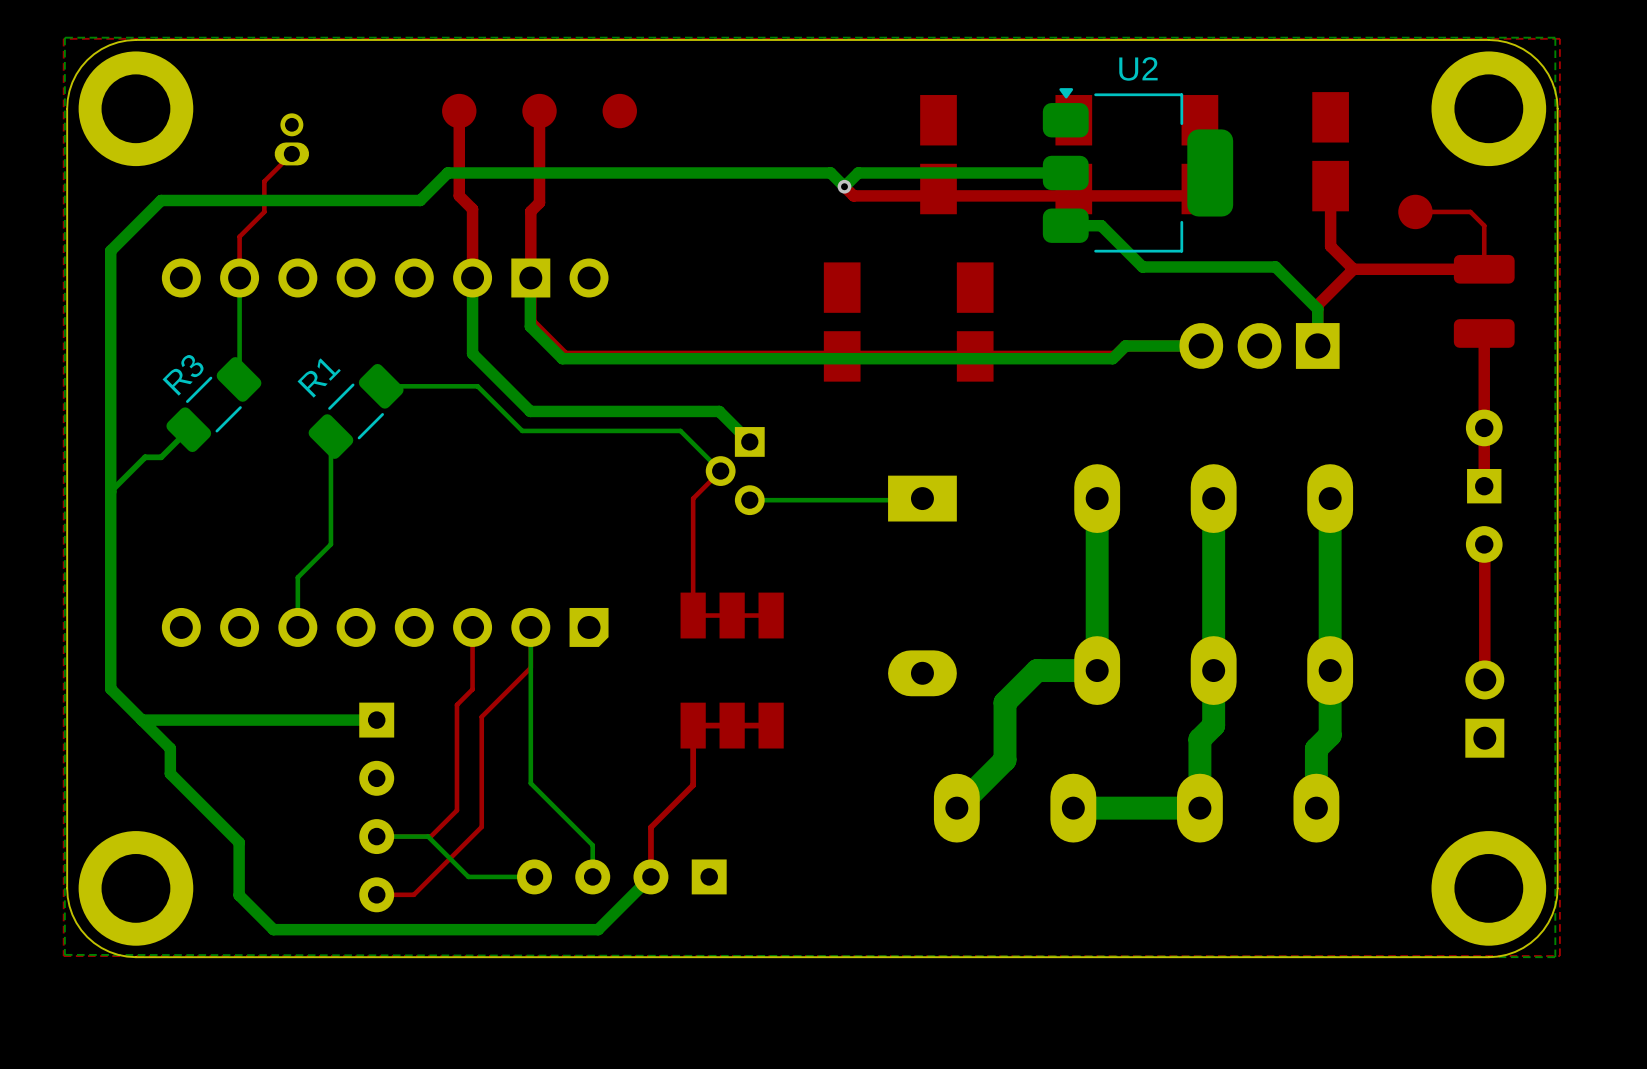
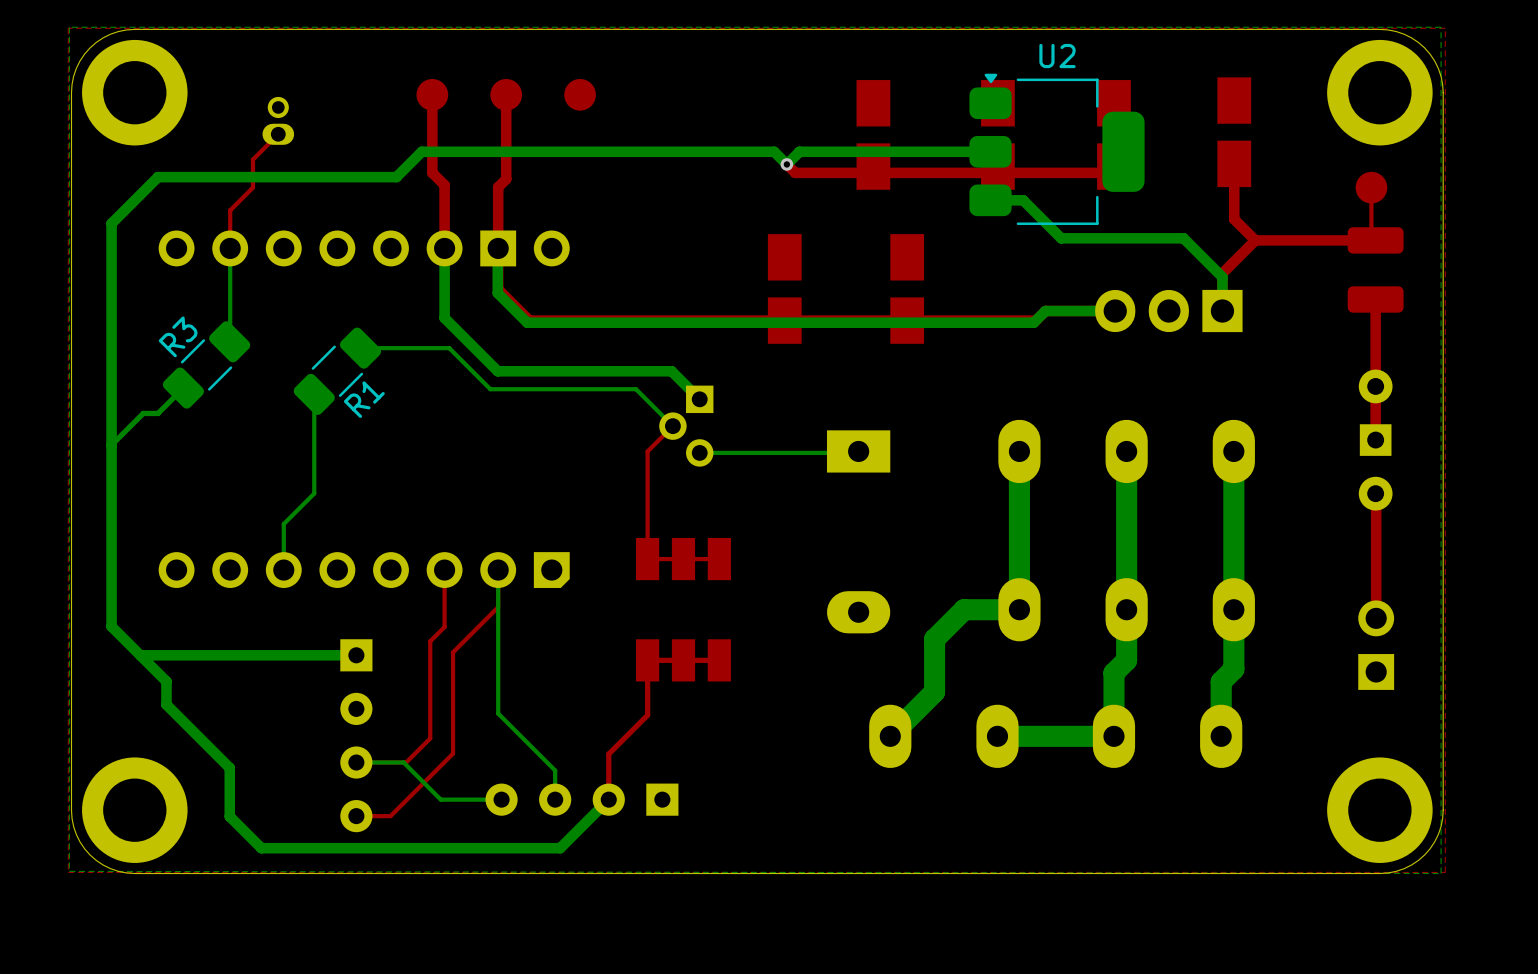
top track: (1415, 211) (1470, 211) (1484, 225) (1484, 269) -> (1371, 187) (1371, 236) (1375, 240)
part position: (1415, 211) -> (1371, 187)
R1 name position: R1 (319, 378) -> R1 (364, 399)

